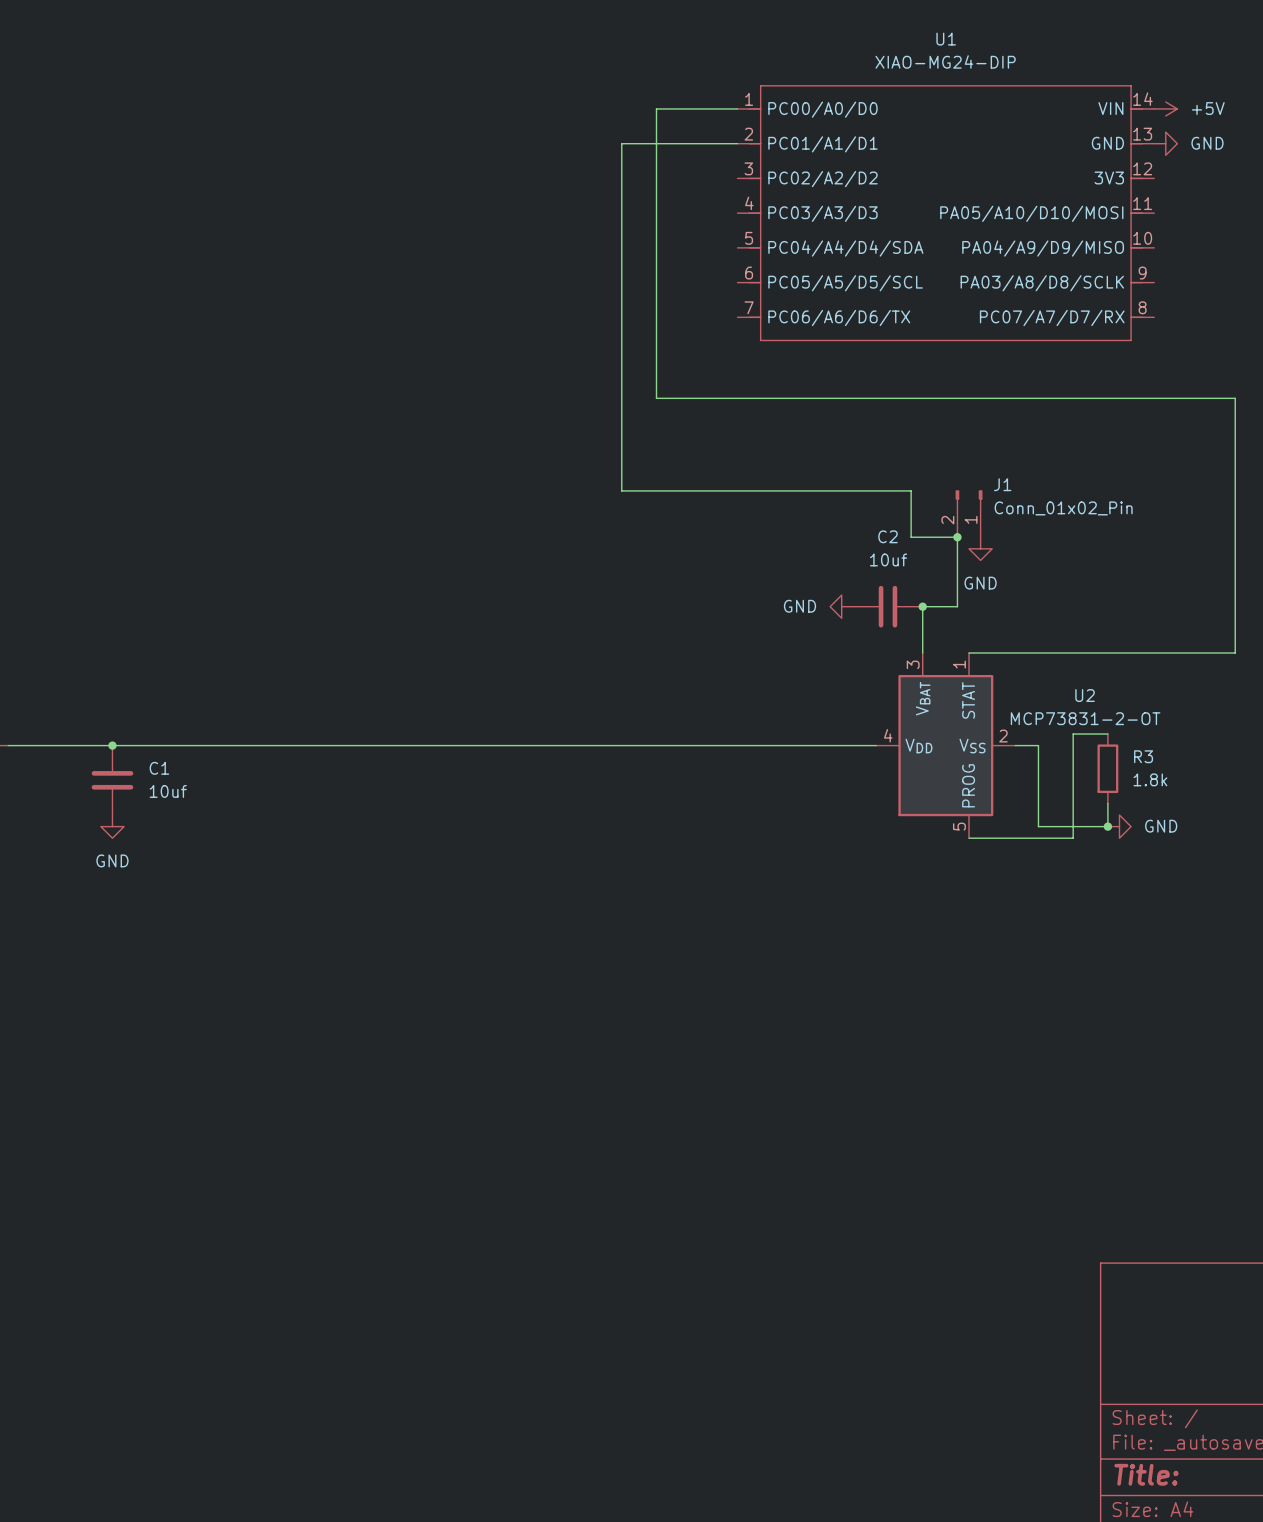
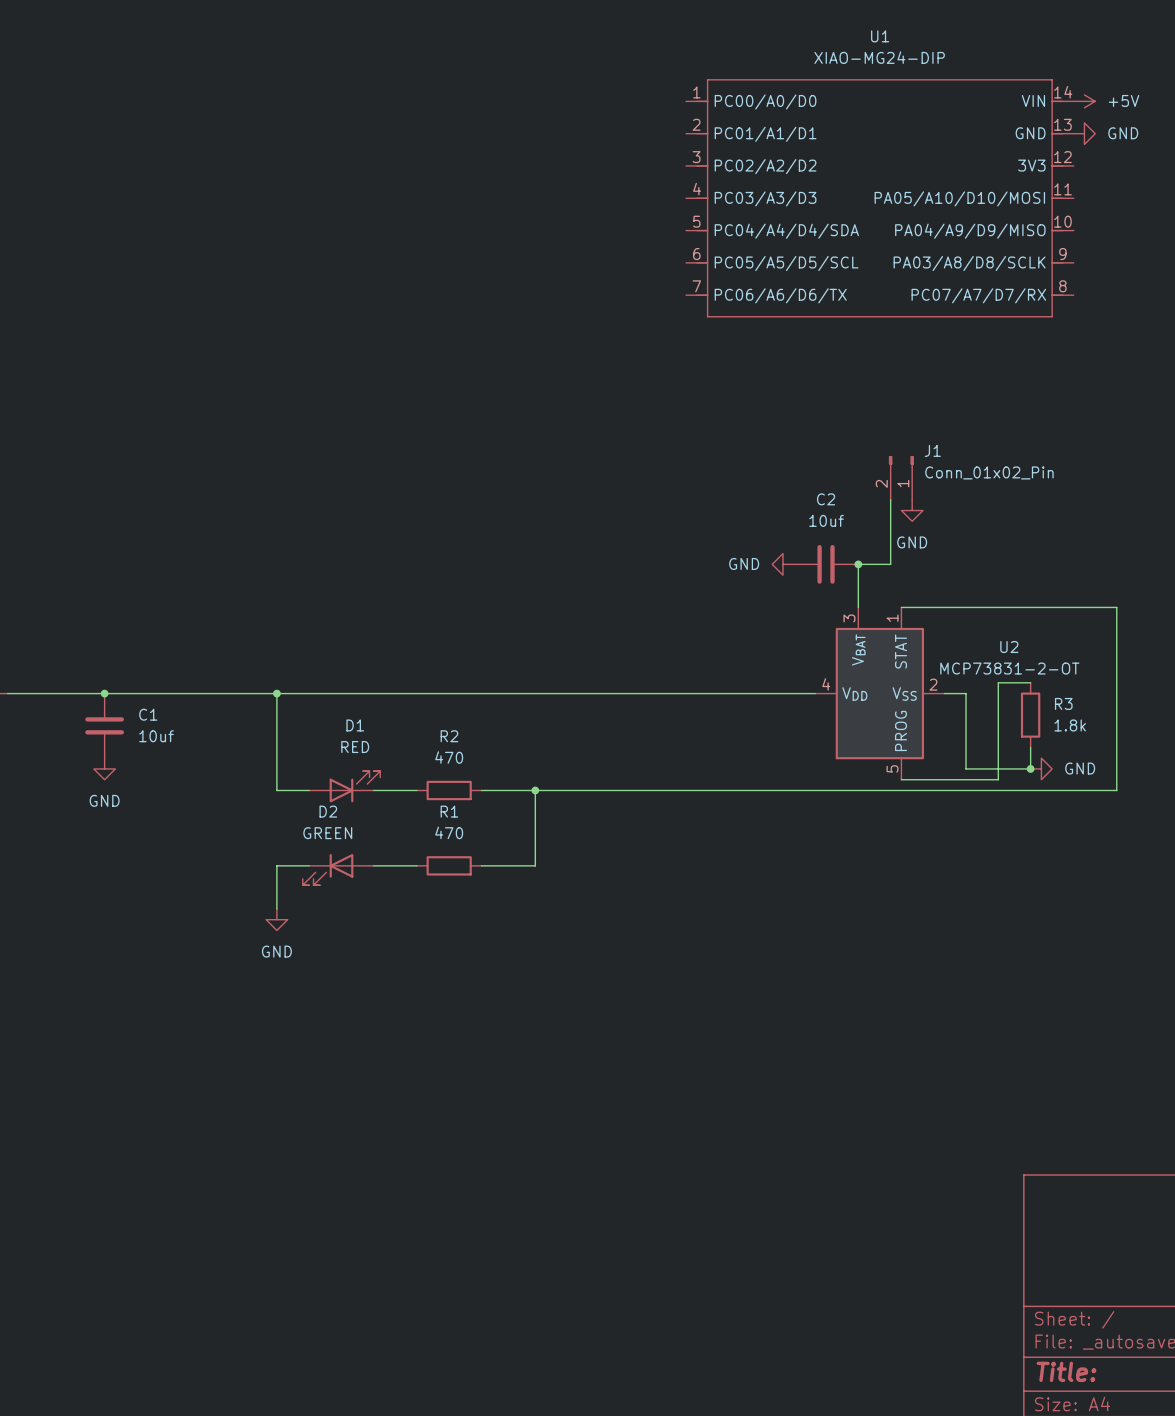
wire: (737, 108) (656, 108) (656, 398) (1235, 398) (1235, 653) (1200, 653) -> (481, 790) (1116, 790) (1116, 607)
wire: (737, 143) (621, 143) (621, 490) (911, 490) (911, 537) (957, 537) -> none
junction: (957, 537) -> none
wire: none -> (276, 693) (276, 790) (309, 790)
junction: none -> (276, 693)
D1: none -> RED (344, 786)
wire: none -> (373, 790) (416, 790)
R2: none -> 470 (449, 790)
wire: none -> (535, 790) (535, 865) (481, 865)
junction: none -> (535, 790)
wire: none -> (309, 865) (276, 865) (276, 908)
wire: none -> (373, 865) (416, 865)
R1: none -> 470 (449, 865)
D2: none -> GREEN (338, 869)
power symbol: none -> GND (276, 919)

